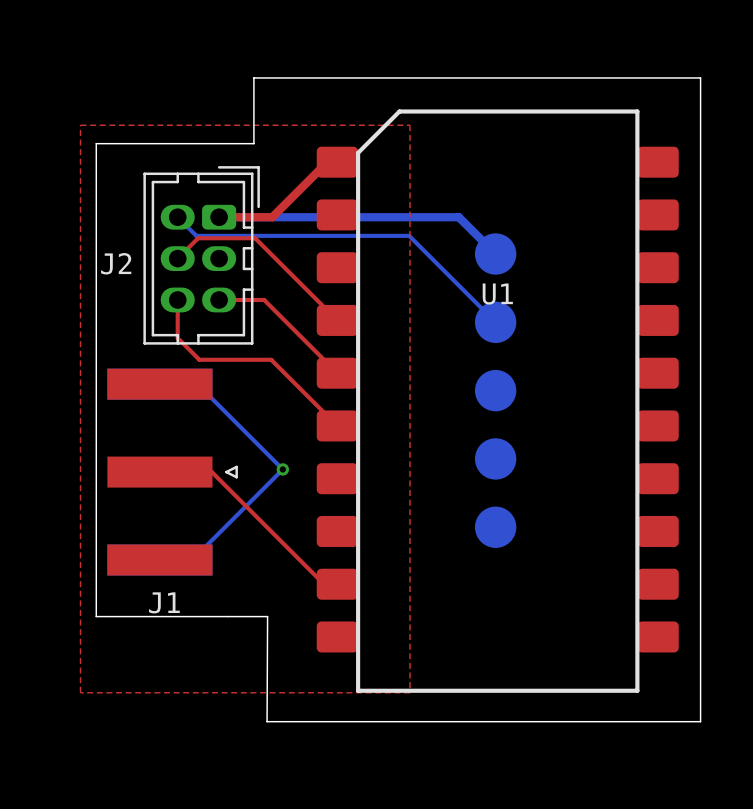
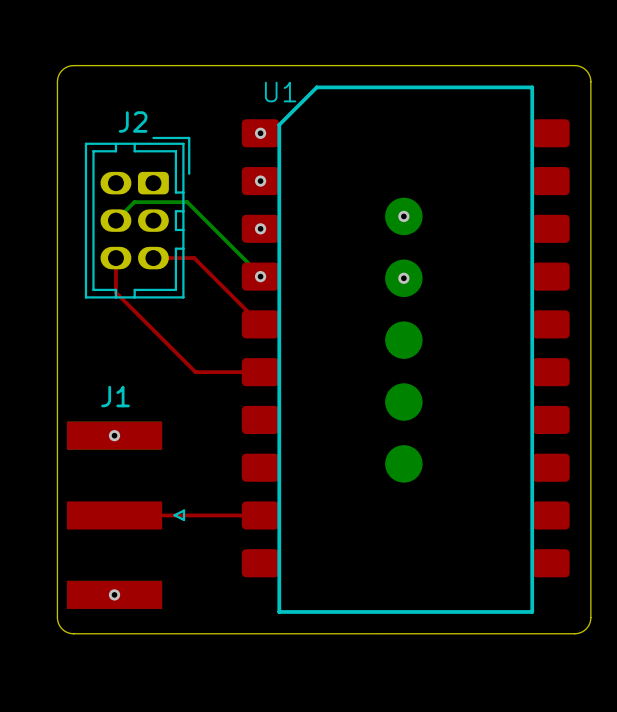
board edge: (253, 77) (700, 77) (700, 721) (267, 721) (267, 616) (96, 616) (96, 143) (253, 143) (253, 77) -> (73, 65) (62, 70) (57, 81) (57, 617) (62, 629) (73, 633) (574, 633) (586, 629) (590, 617) (590, 81) (586, 70) (574, 65) (73, 65)
top zone outline: (80, 125) (409, 125) (409, 692) (80, 692) (80, 125) -> none
top track: (337, 162) (327, 162) (272, 217) (219, 217) -> none
via: none -> (260, 133)
via: none -> (260, 181)
bottom track: (177, 217) (196, 235) (409, 235) (495, 322) -> none
bottom track: (219, 217) (458, 217) (495, 254) -> none
via: none -> (403, 216)
top track: (177, 258) (198, 238) (255, 238) (337, 320) -> none
bottom track: none -> (115, 220) (134, 202) (187, 202) (260, 276)
J2 name position: J2 (116, 263) -> J2 (133, 121)
via: none -> (260, 228)
U1 name position: U1 (497, 294) -> U1 (280, 92)
via: none -> (260, 276)
via: none -> (403, 278)
top track: (199, 359) (271, 359) (337, 425) -> (135, 312) (195, 372) (260, 372)
bottom track: (159, 384) (197, 384) (282, 469) (192, 560) (159, 560) -> none
via: (282, 469) -> none
top track: (159, 472) (211, 472) (324, 584) -> (114, 515) (248, 515)
J1 position: (172, 472) -> (126, 515)
via: none -> (114, 435)
J1 name position: J1 (164, 602) -> J1 (115, 396)
via: none -> (114, 594)

